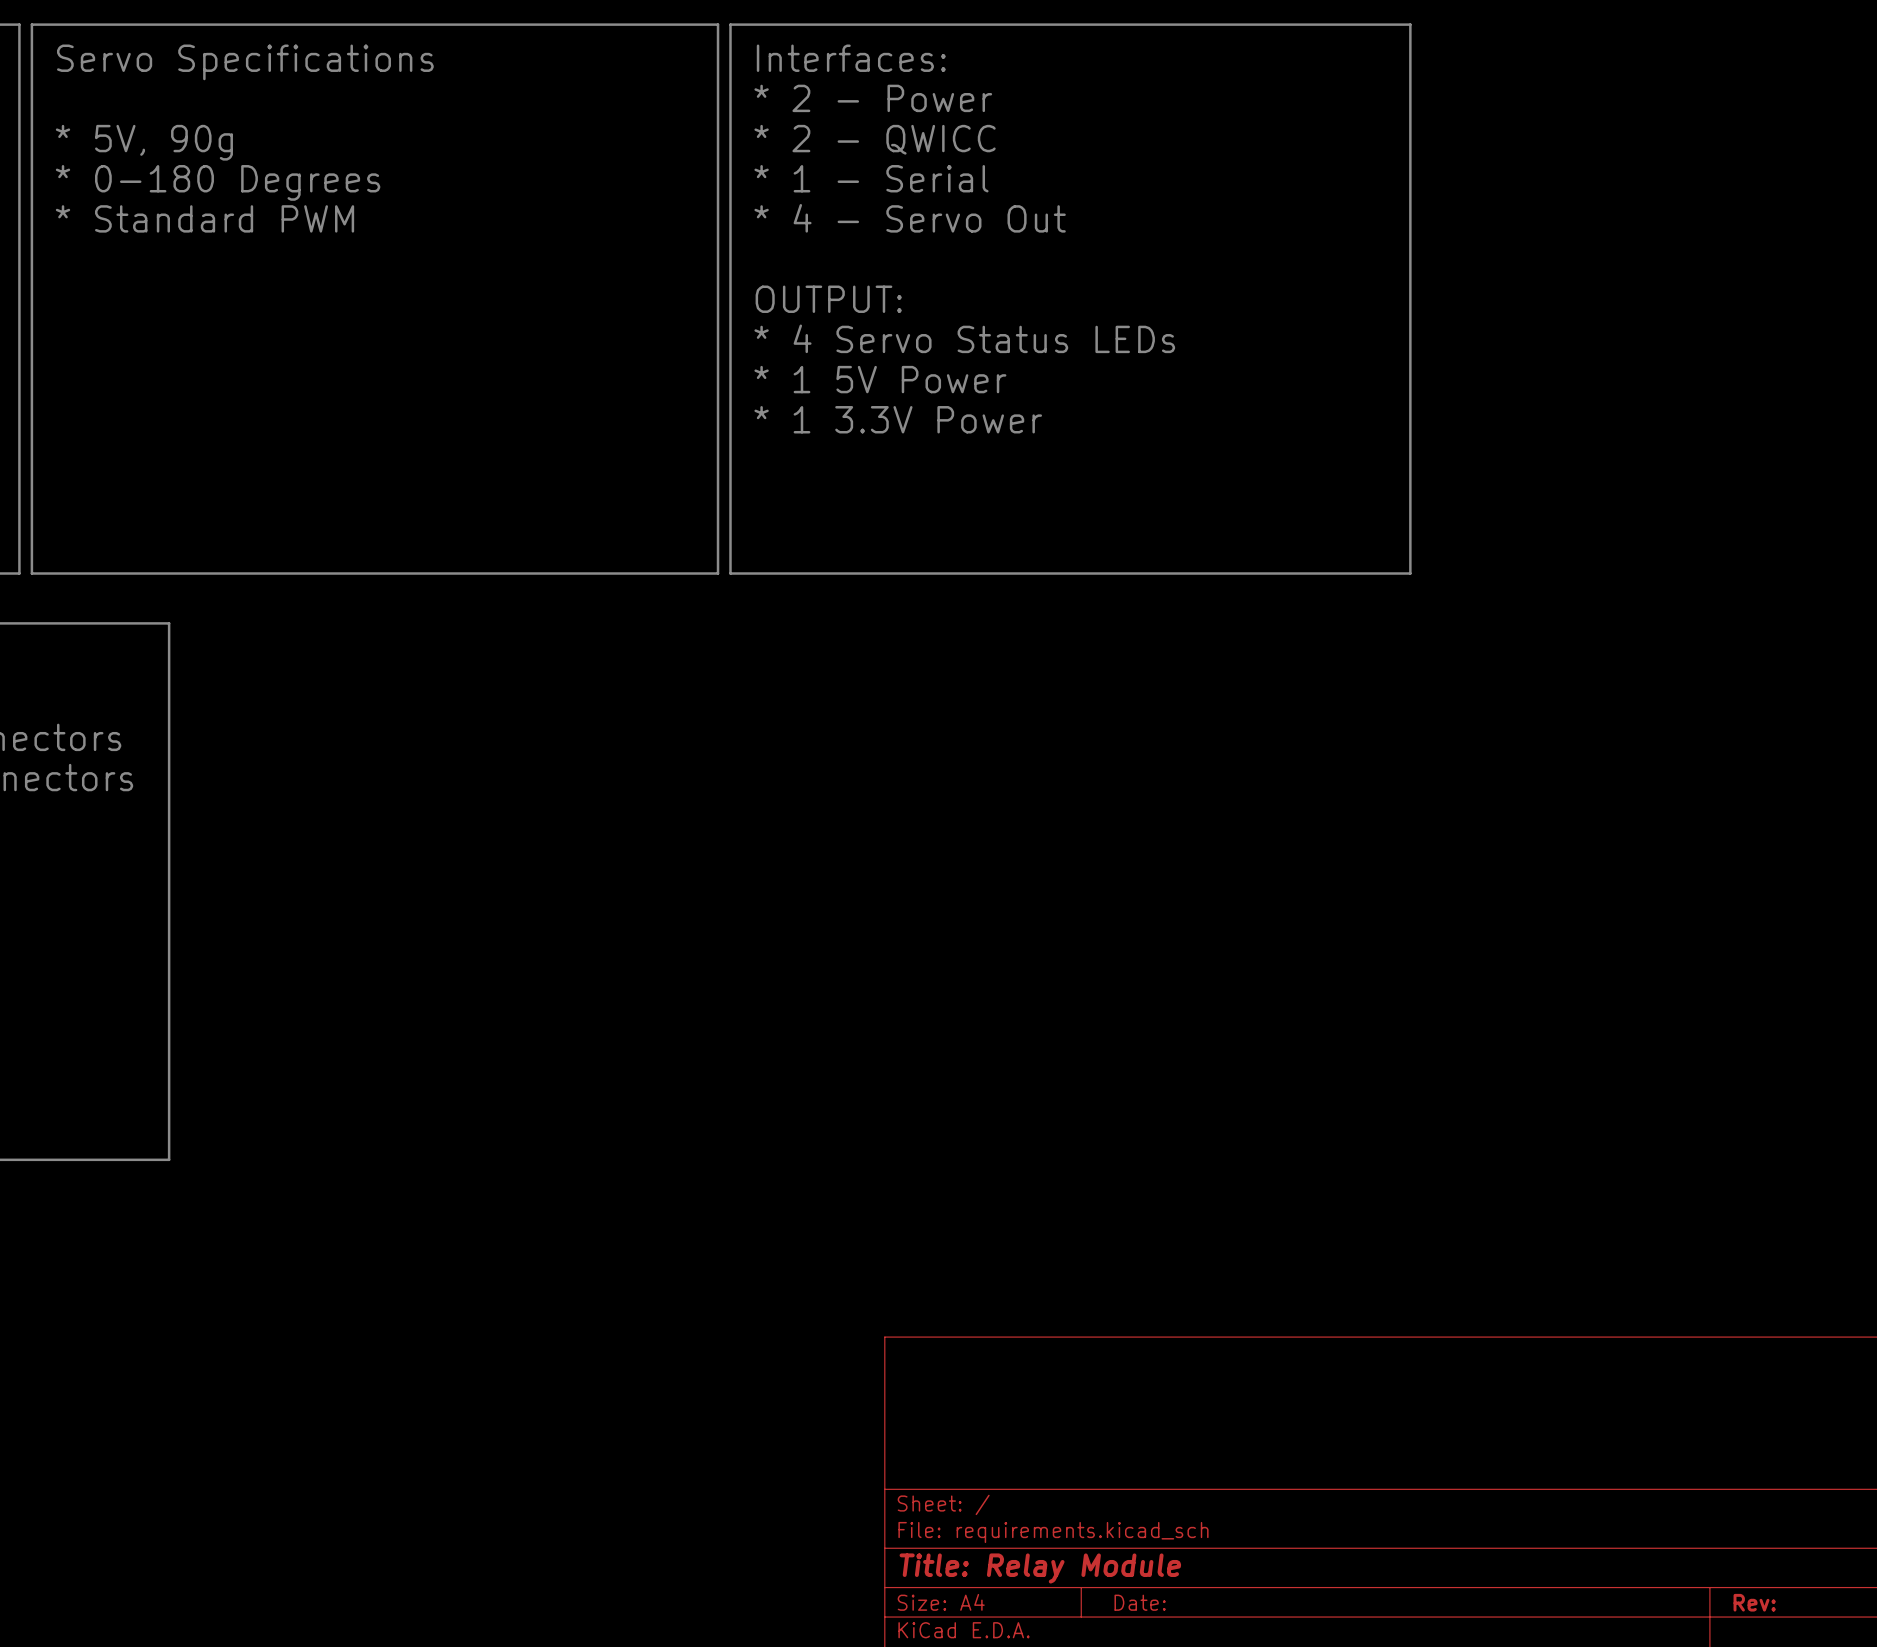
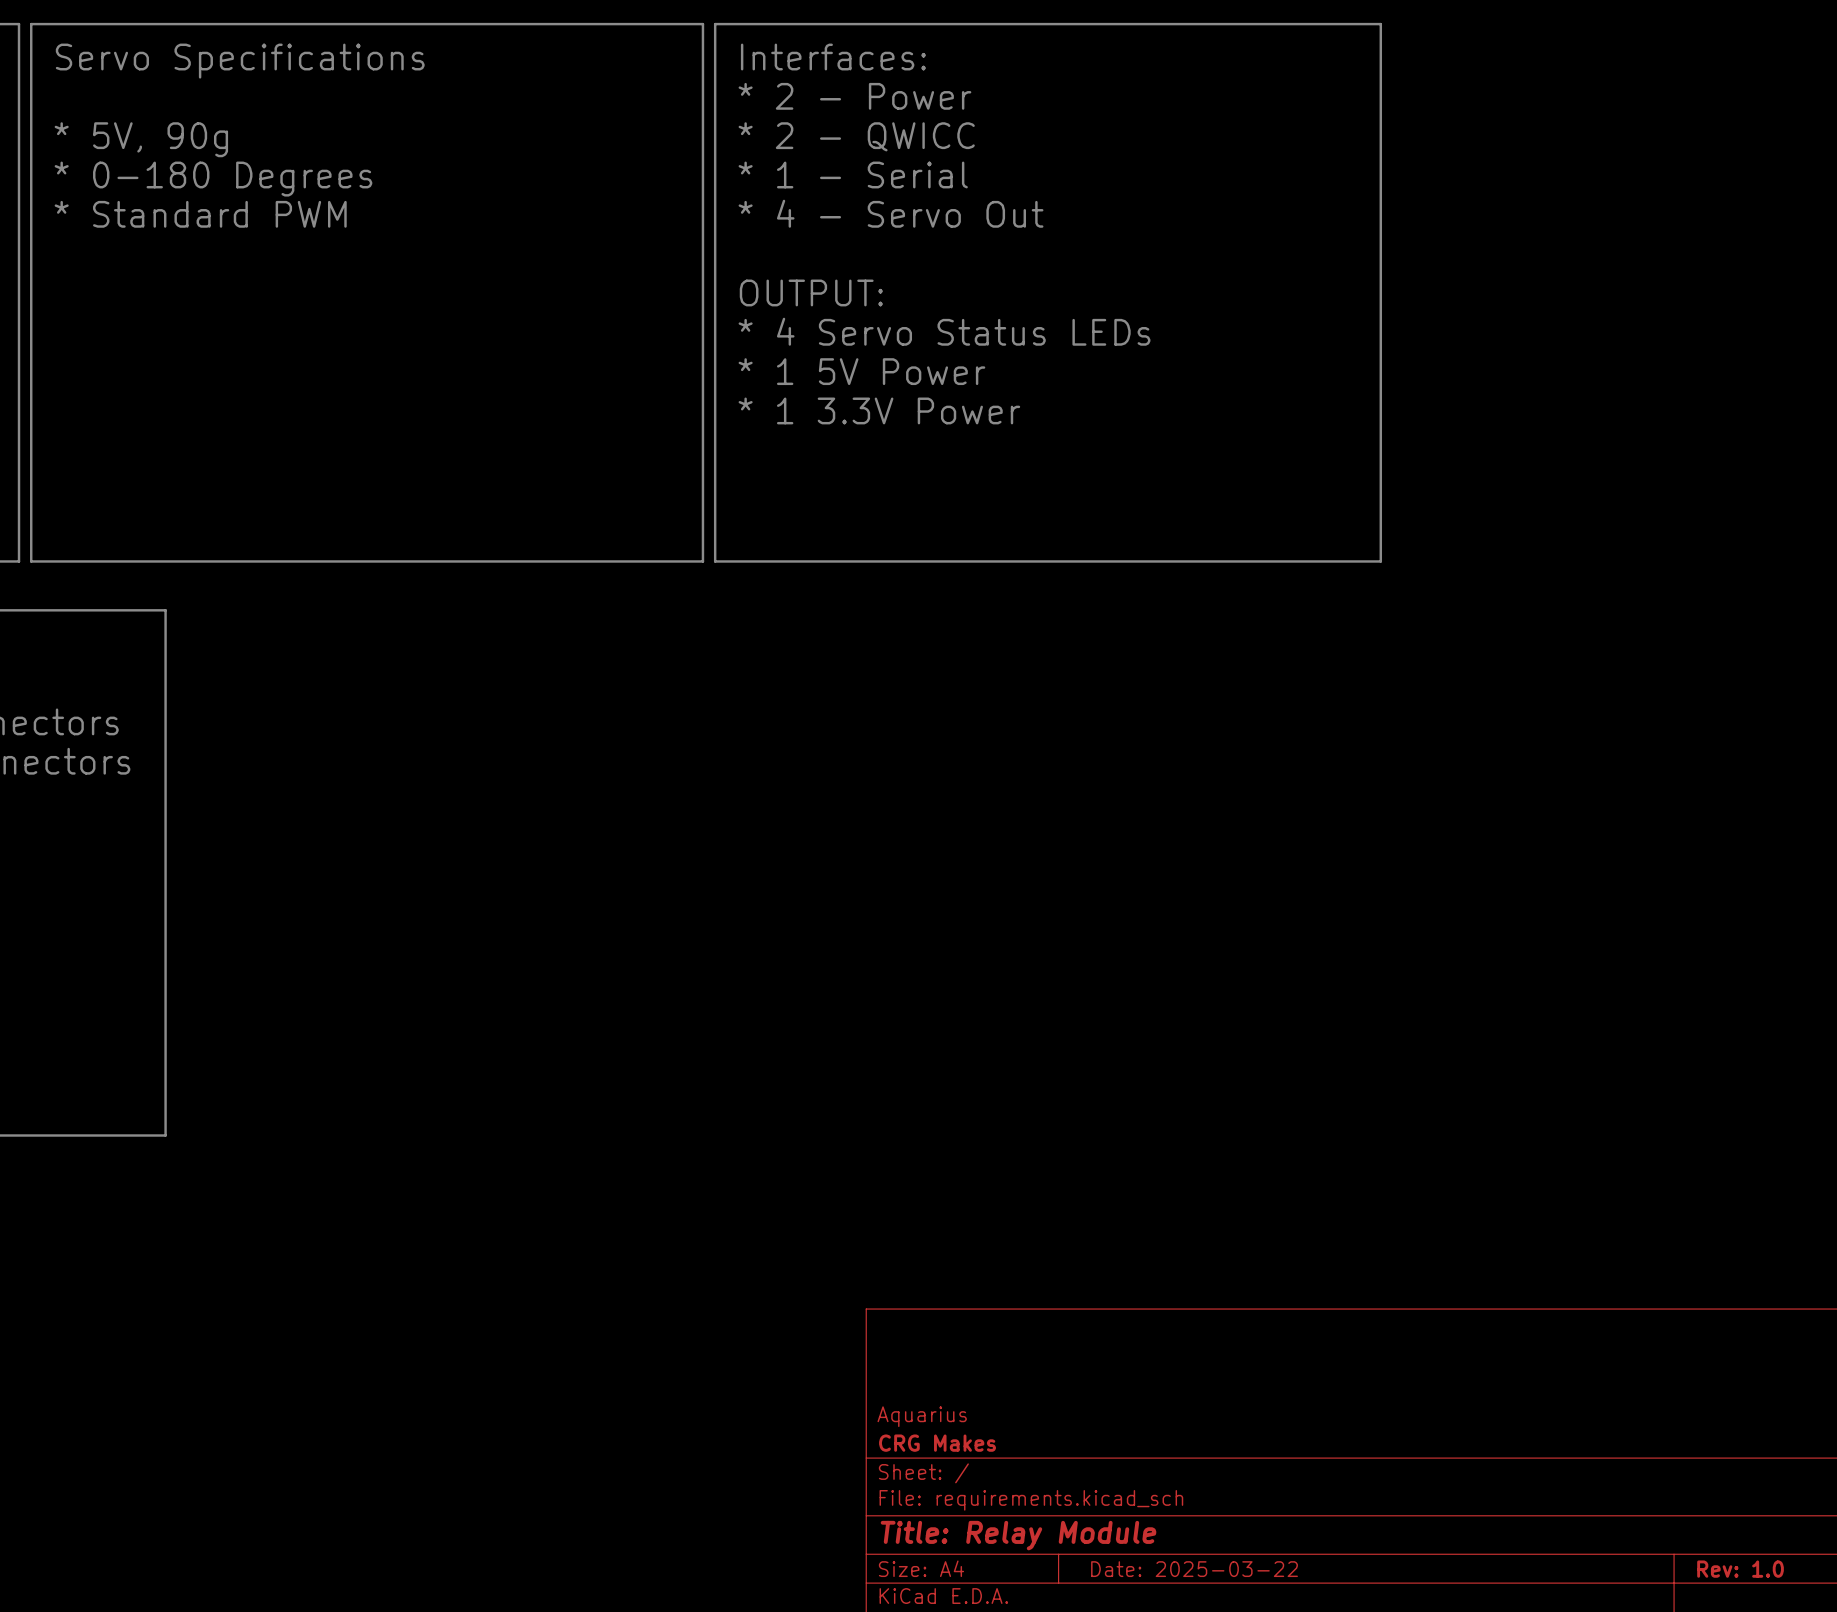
title block: none -> Aquarius (922, 1416)
title block: none -> CRG Makes (937, 1443)
title block: Date: (1140, 1602) -> Date: 2025-03-22 (1194, 1569)
title block: Rev: (1754, 1602) -> Rev: 1.0 (1740, 1569)

